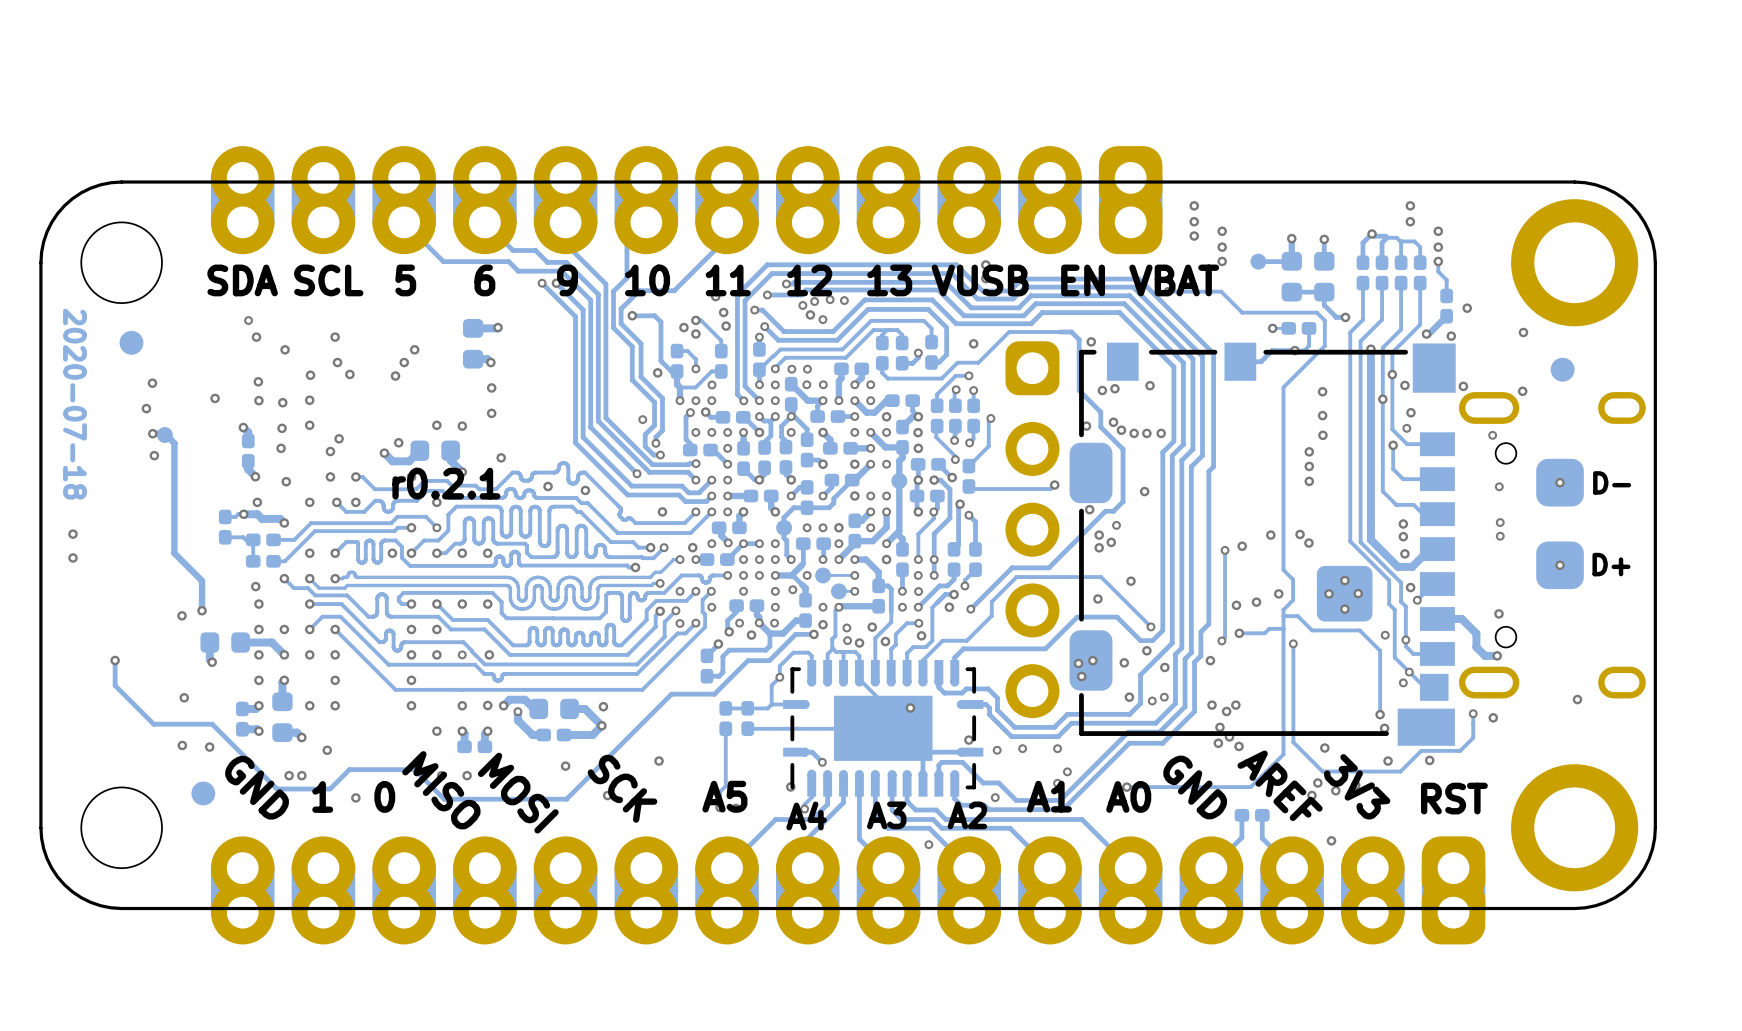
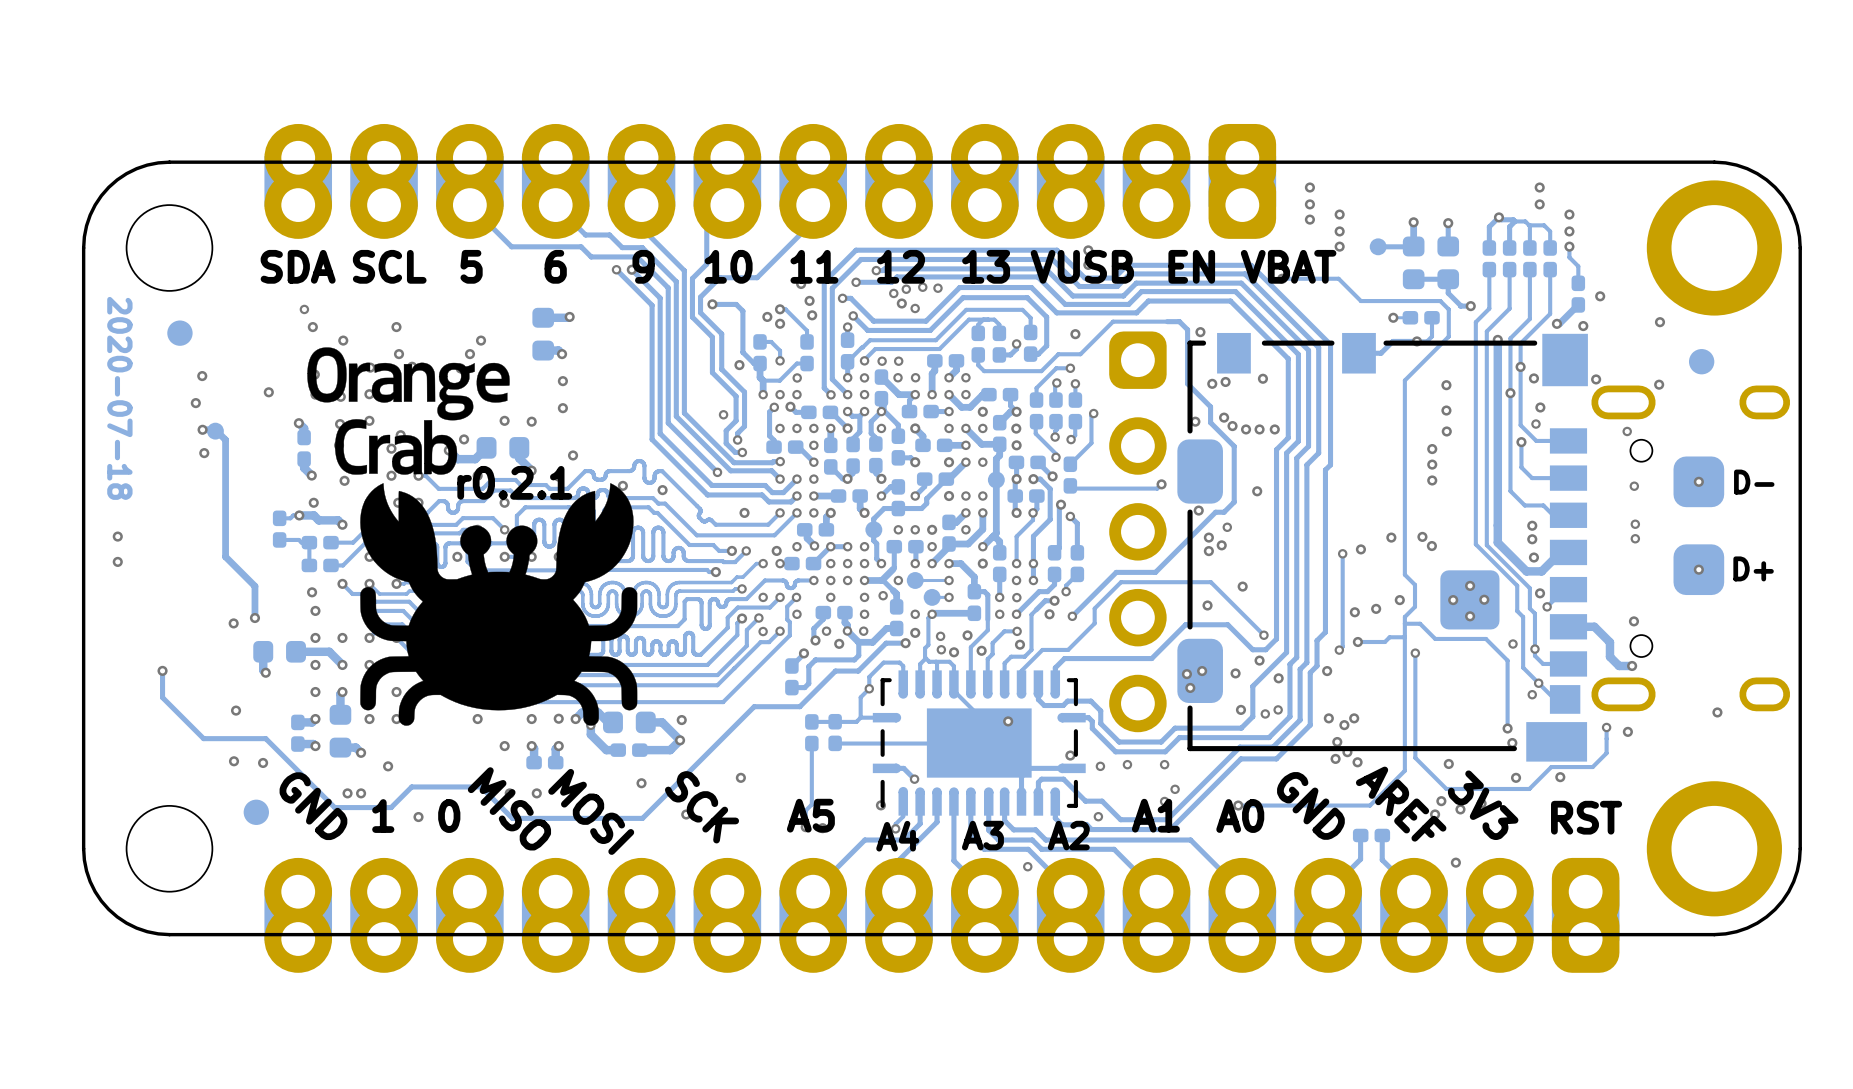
drawing: none -> [307, 347, 638, 726]

